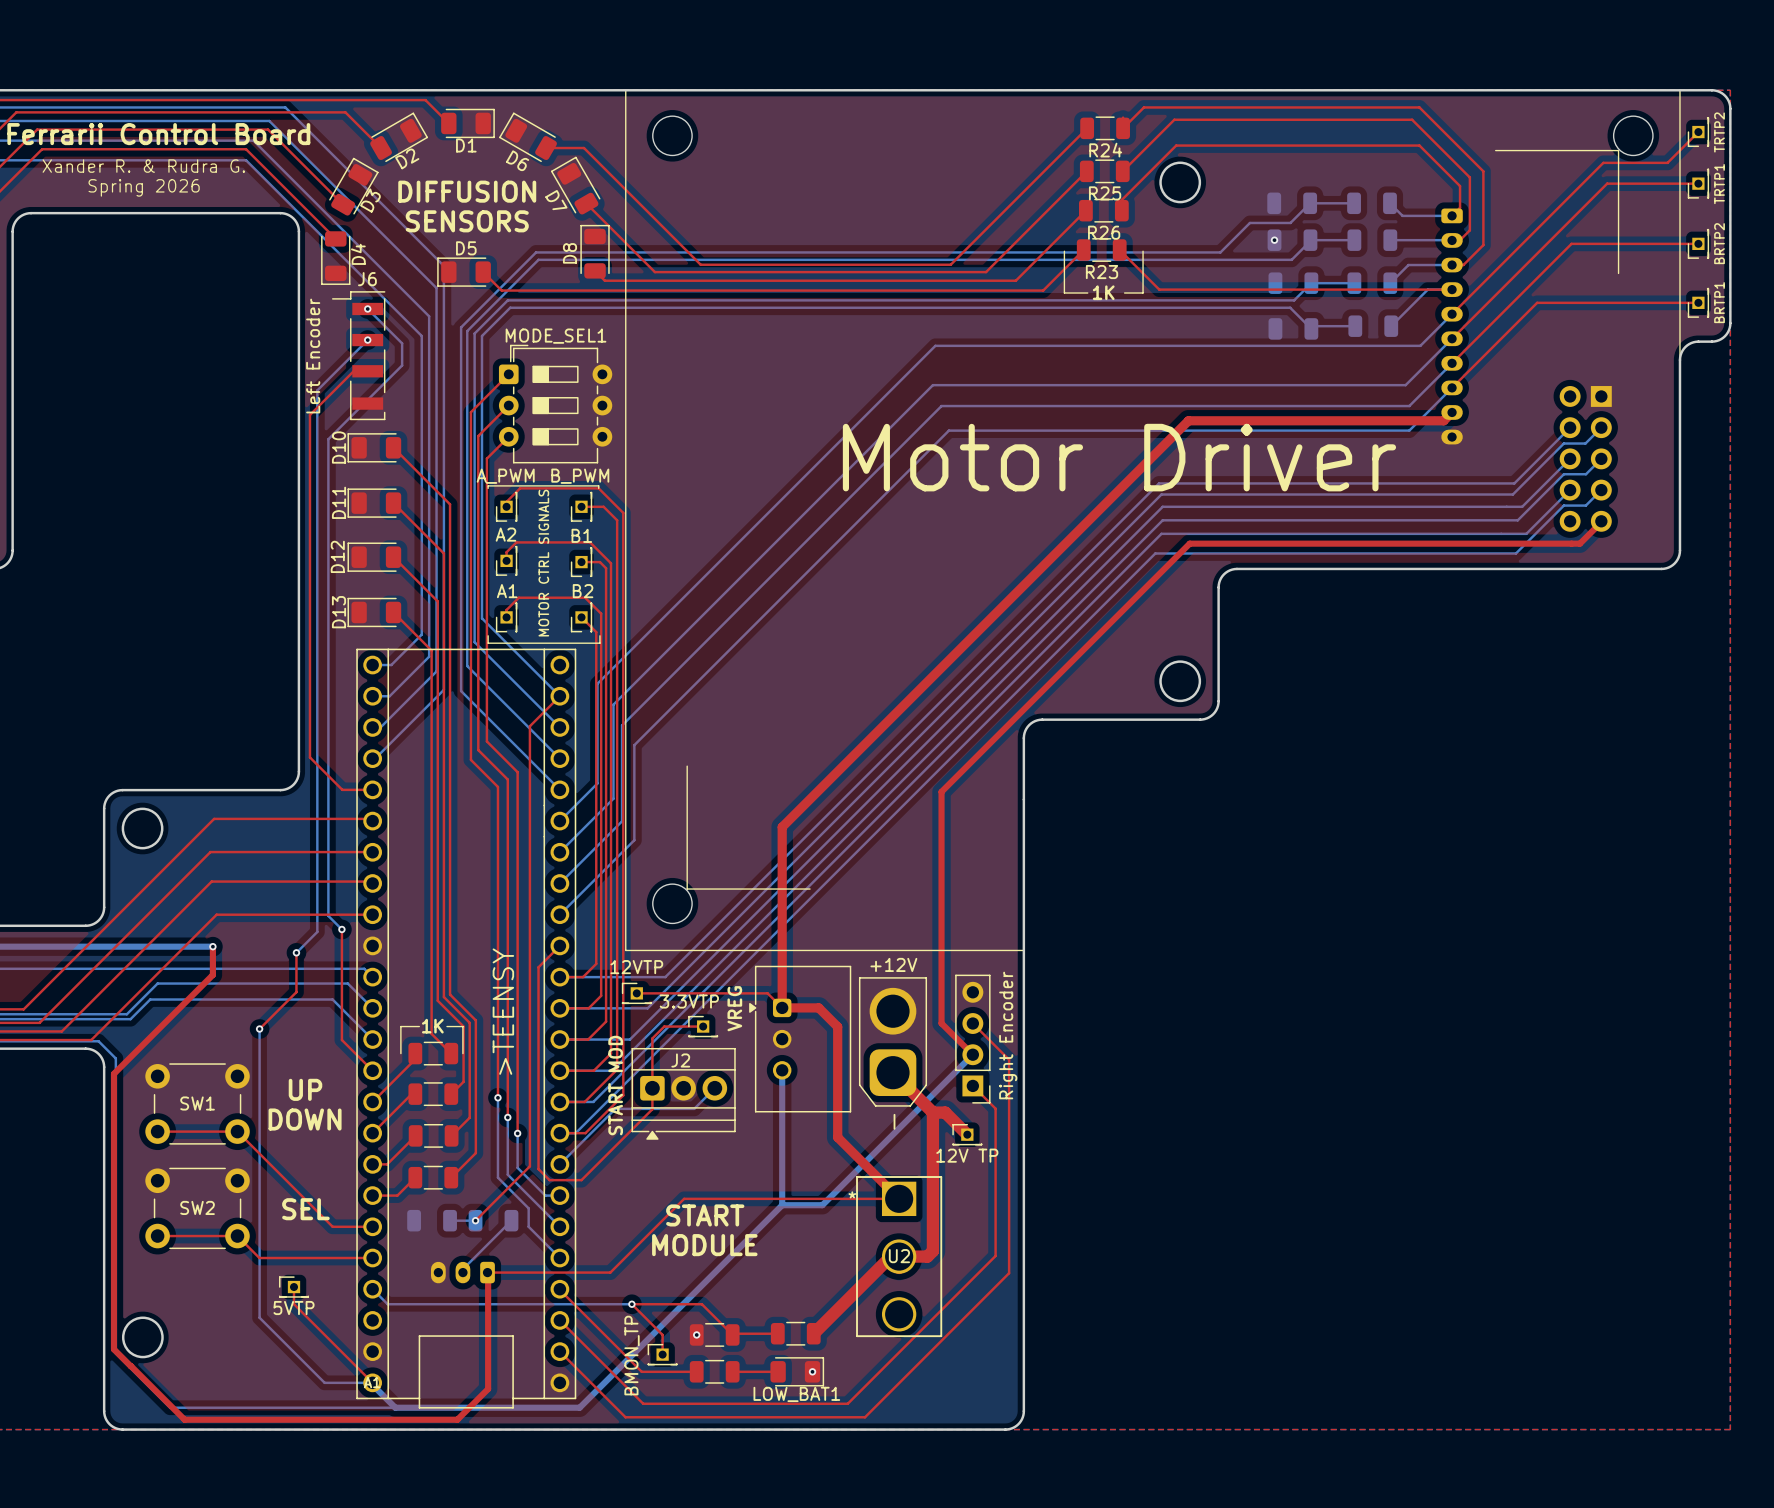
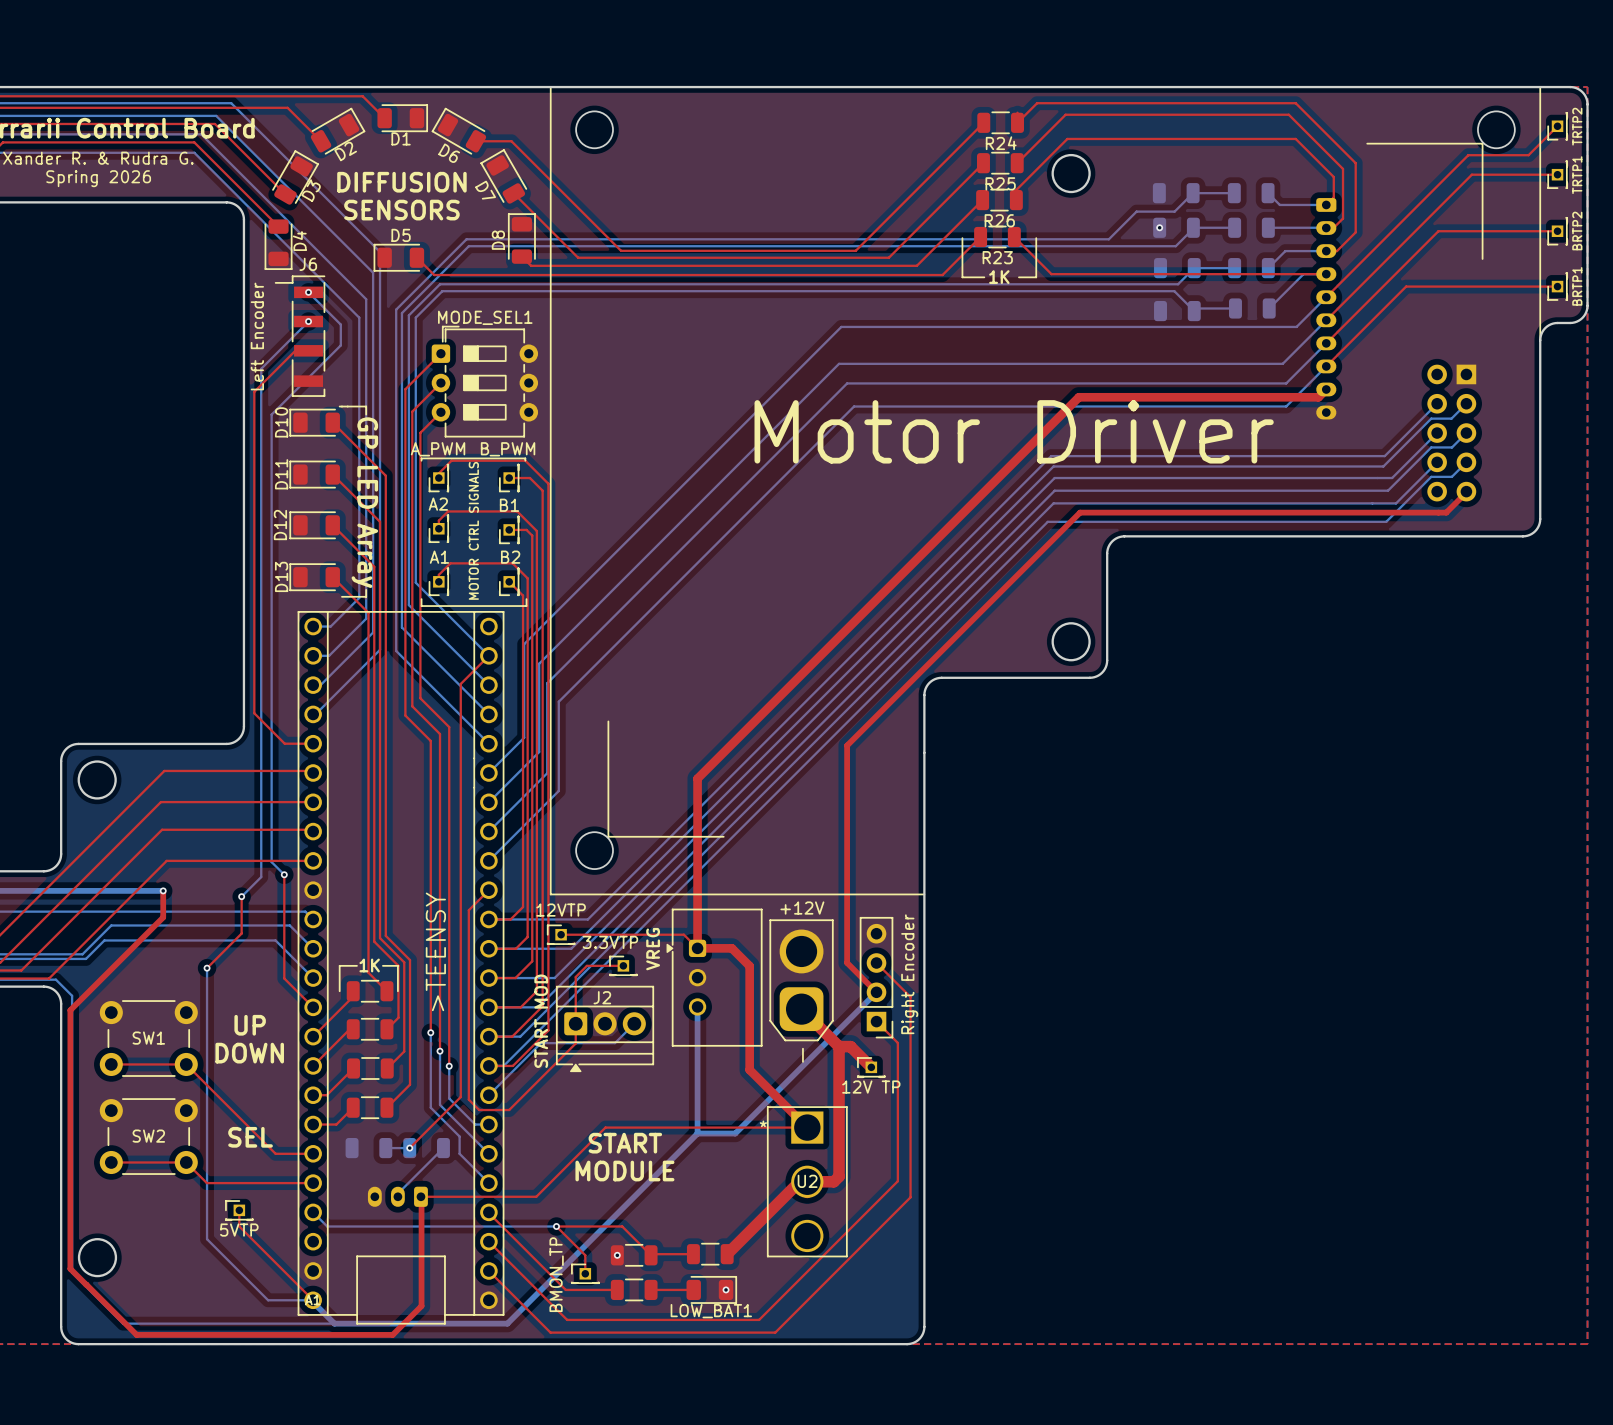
line: none -> (339, 406) (366, 406) (366, 414)
text: none -> GP LED Array (364, 502)
line: none -> (366, 589) (366, 596) (341, 596)

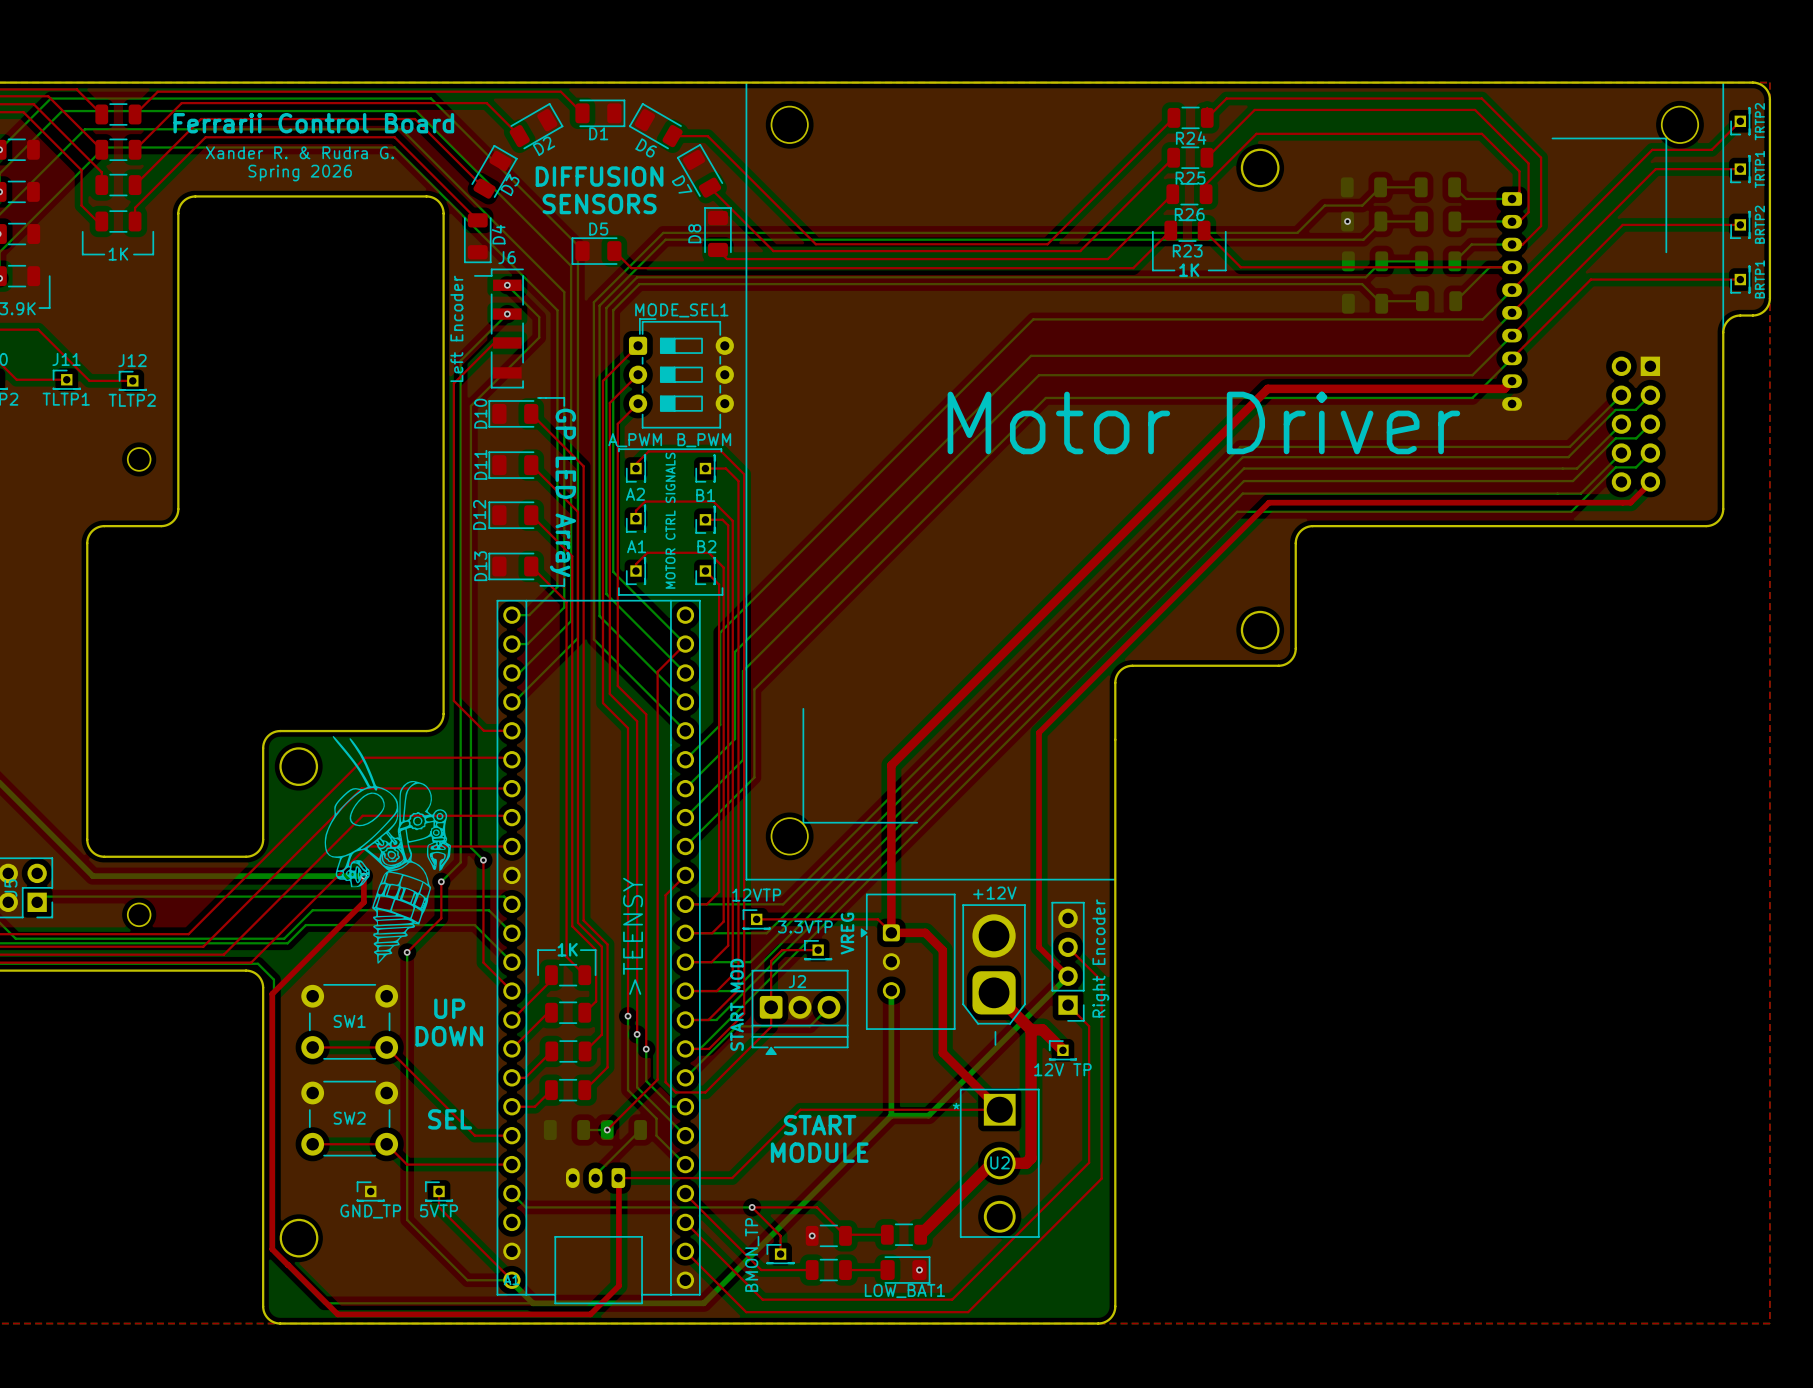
drawing: none -> [324, 736, 451, 964]
part: none -> GND_TP (370, 1191)

